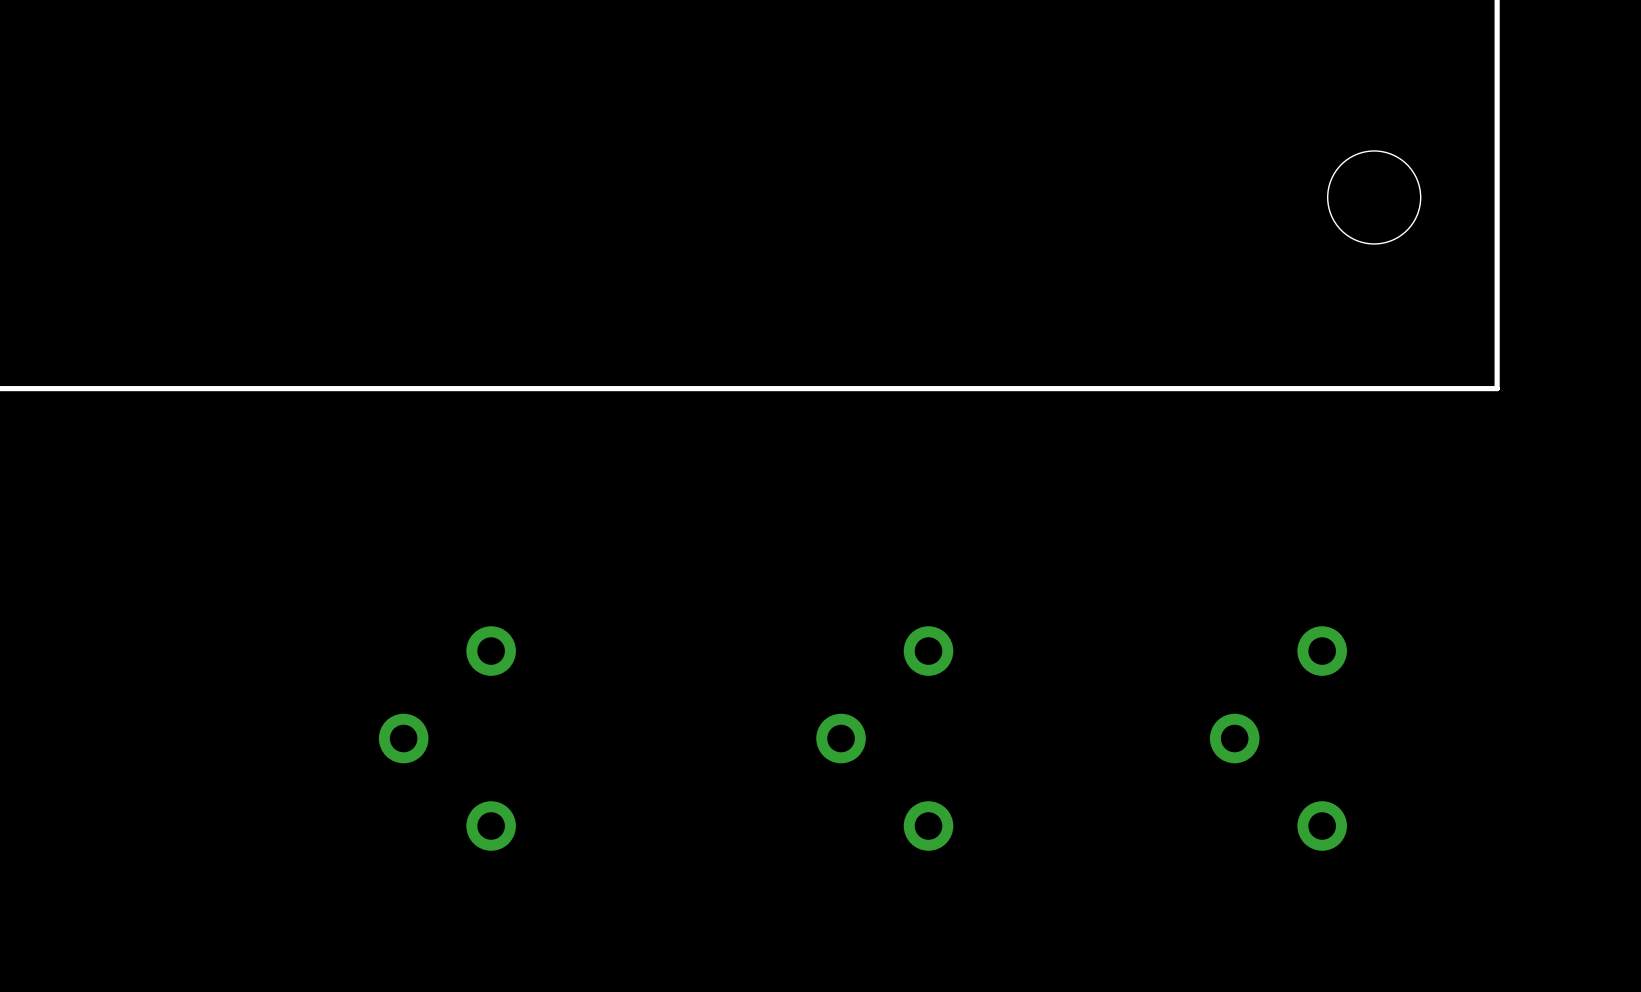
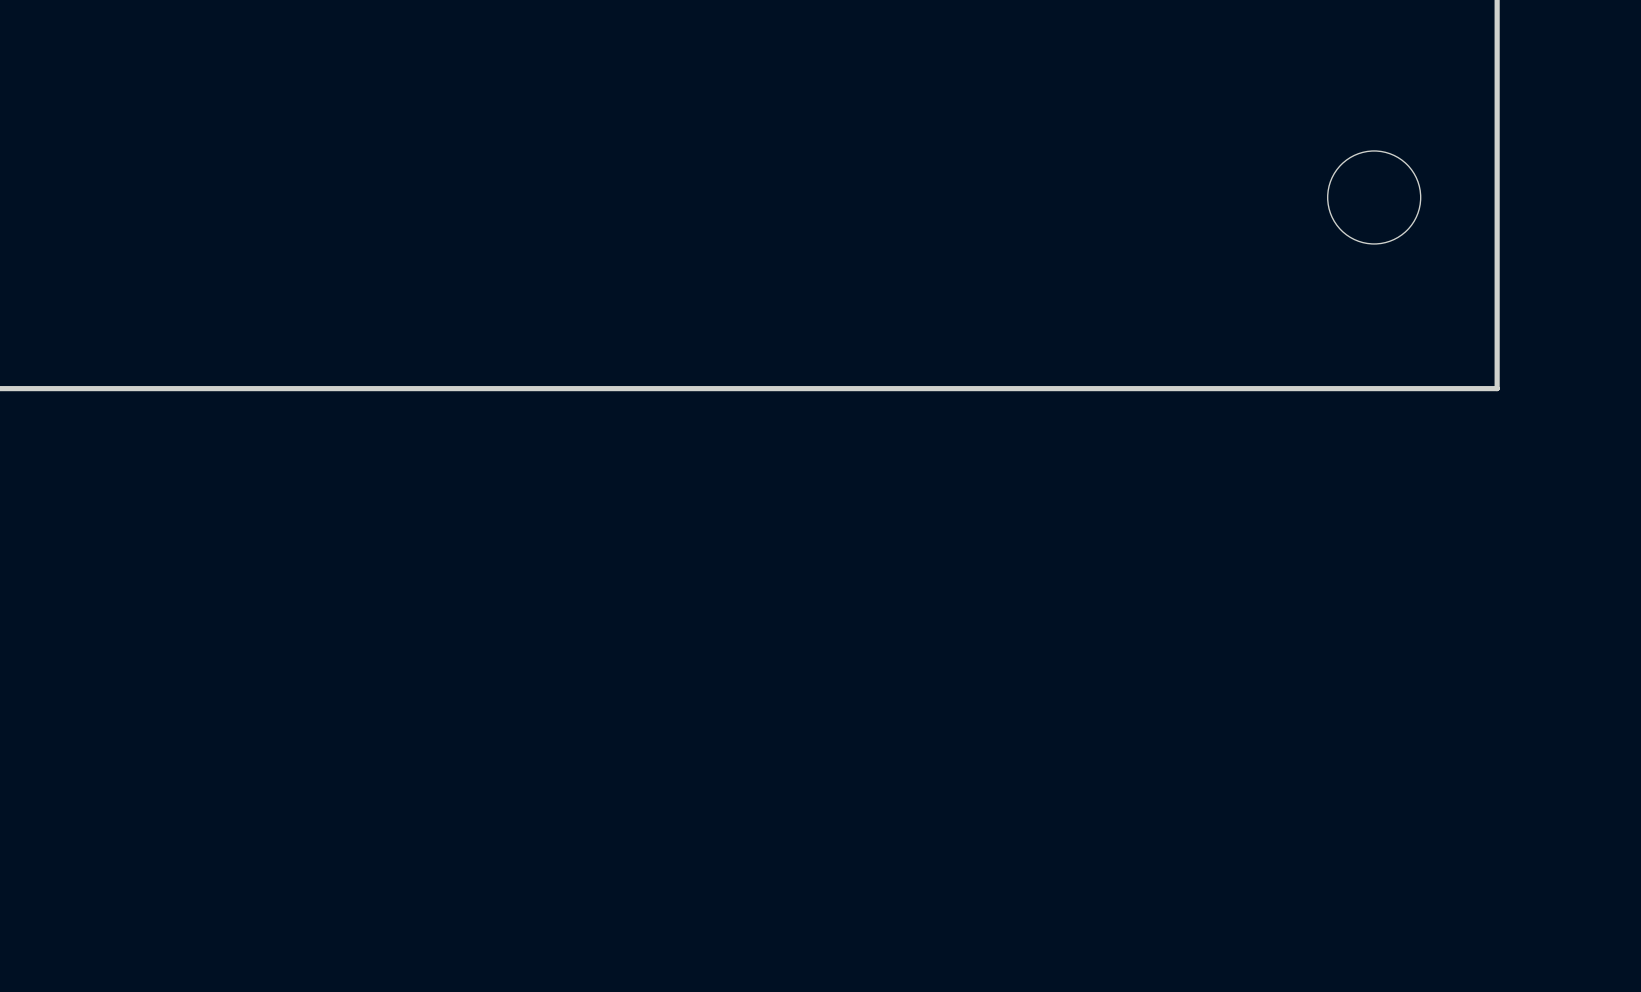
part: (447, 738) -> none
part: (884, 738) -> none
part: (1278, 738) -> none

